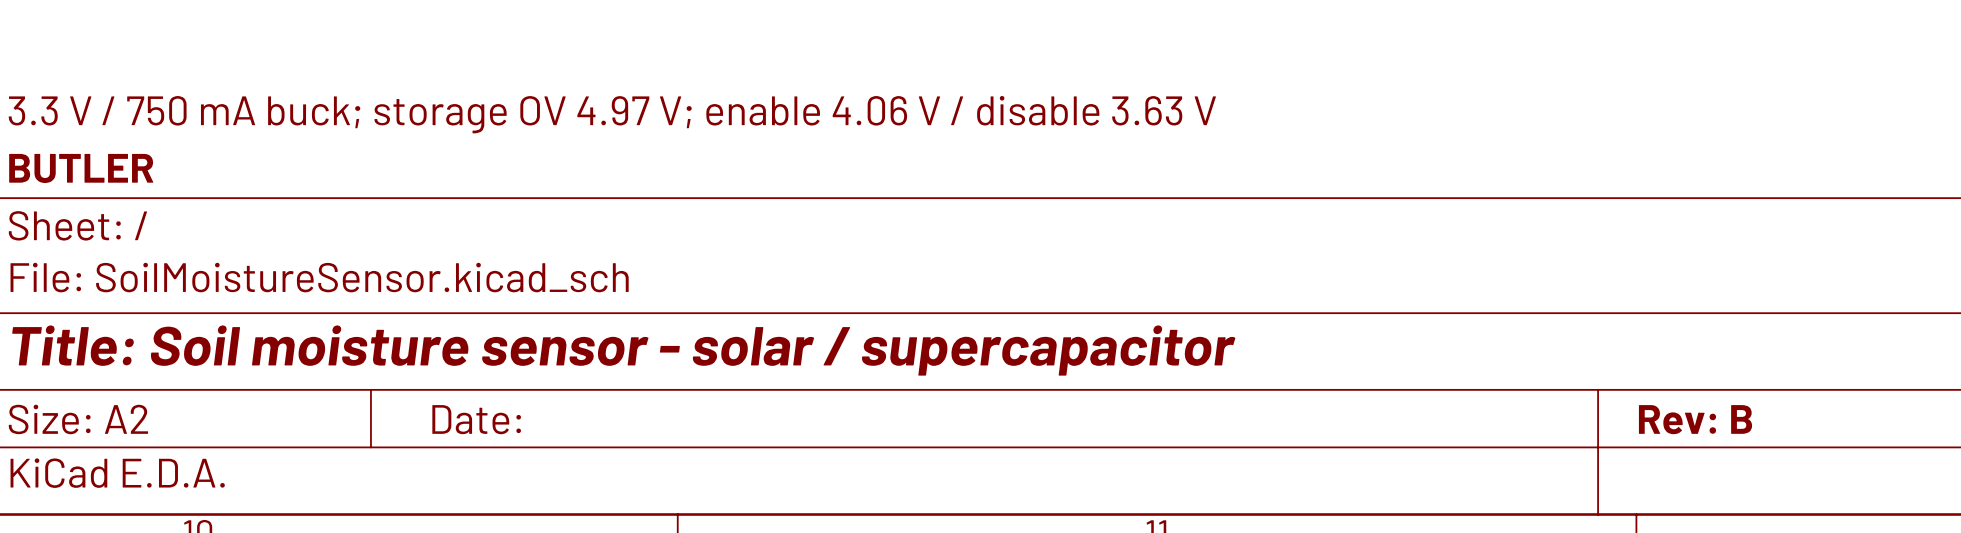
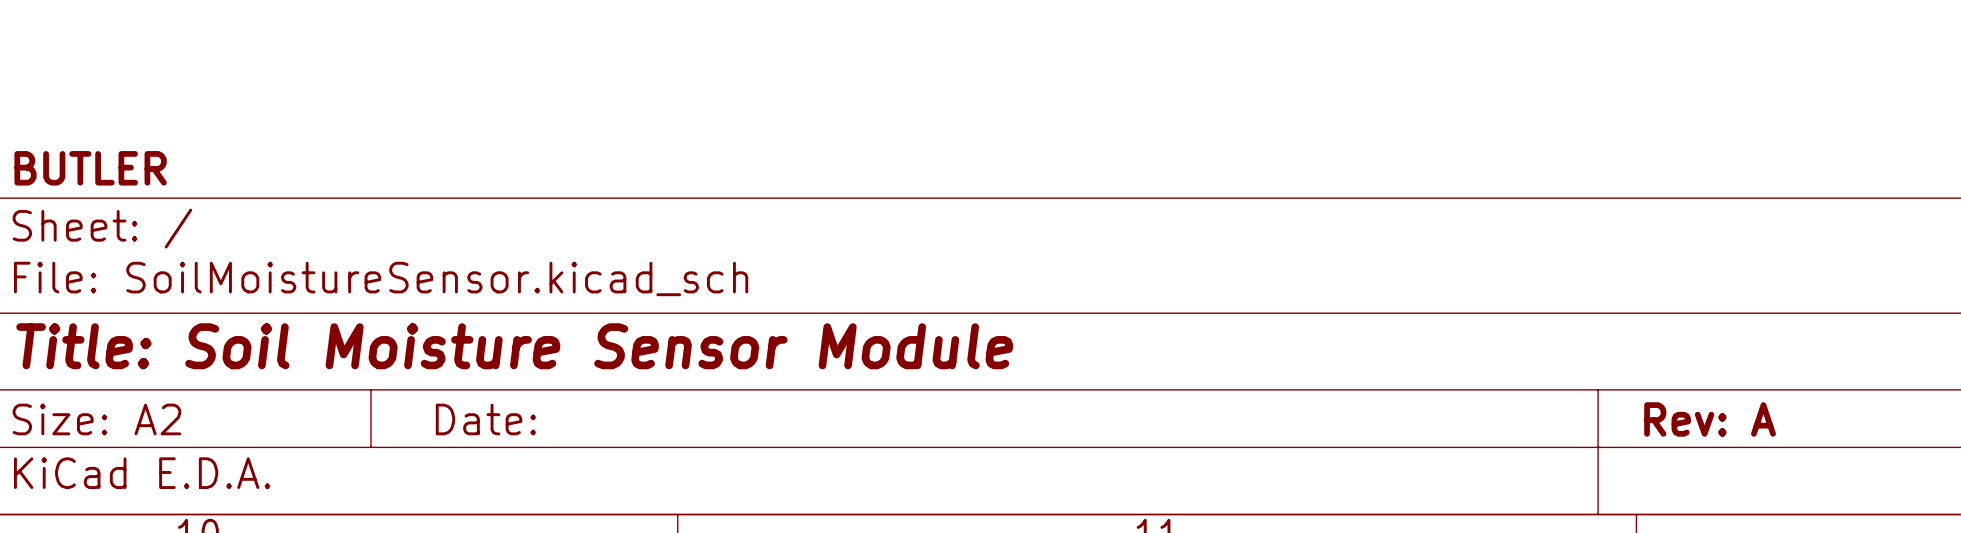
title block: 3.3 V / 750 mA buck; storage OV 4.97 V; enable 4.06 V / disable 3.63 V (612, 114) -> none
title block: Title: Soil moisture sensor - solar / supercapacitor (623, 350) -> Title: Soil Moisture Sensor Module (514, 346)
title block: Rev: B (1695, 419) -> Rev: A (1710, 419)

